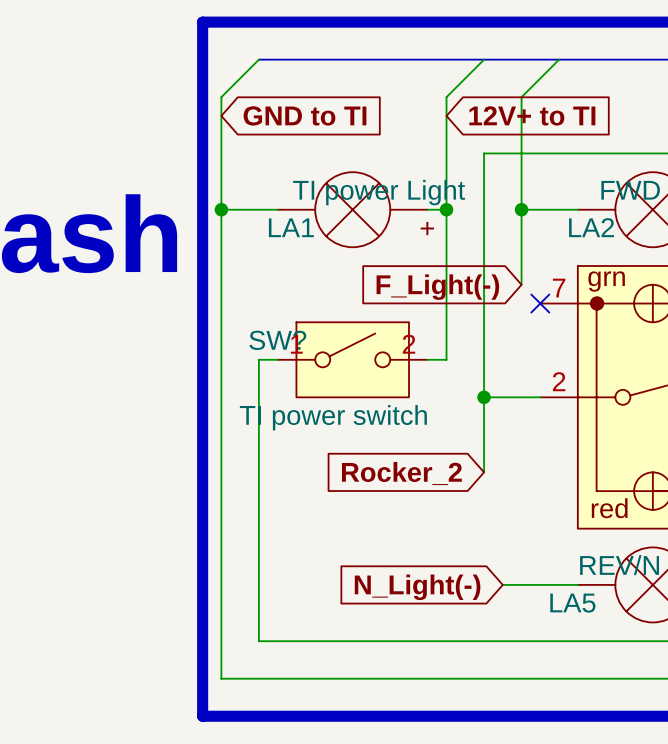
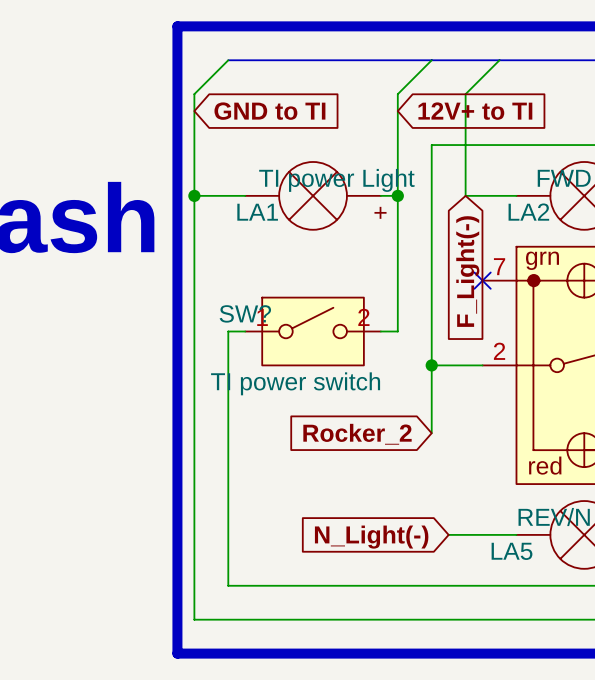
wire: (521, 209) (521, 284) -> none
junction: (521, 209) -> none
global label rotation: 0° (437, 287) -> 90° counterclockwise (467, 271)

